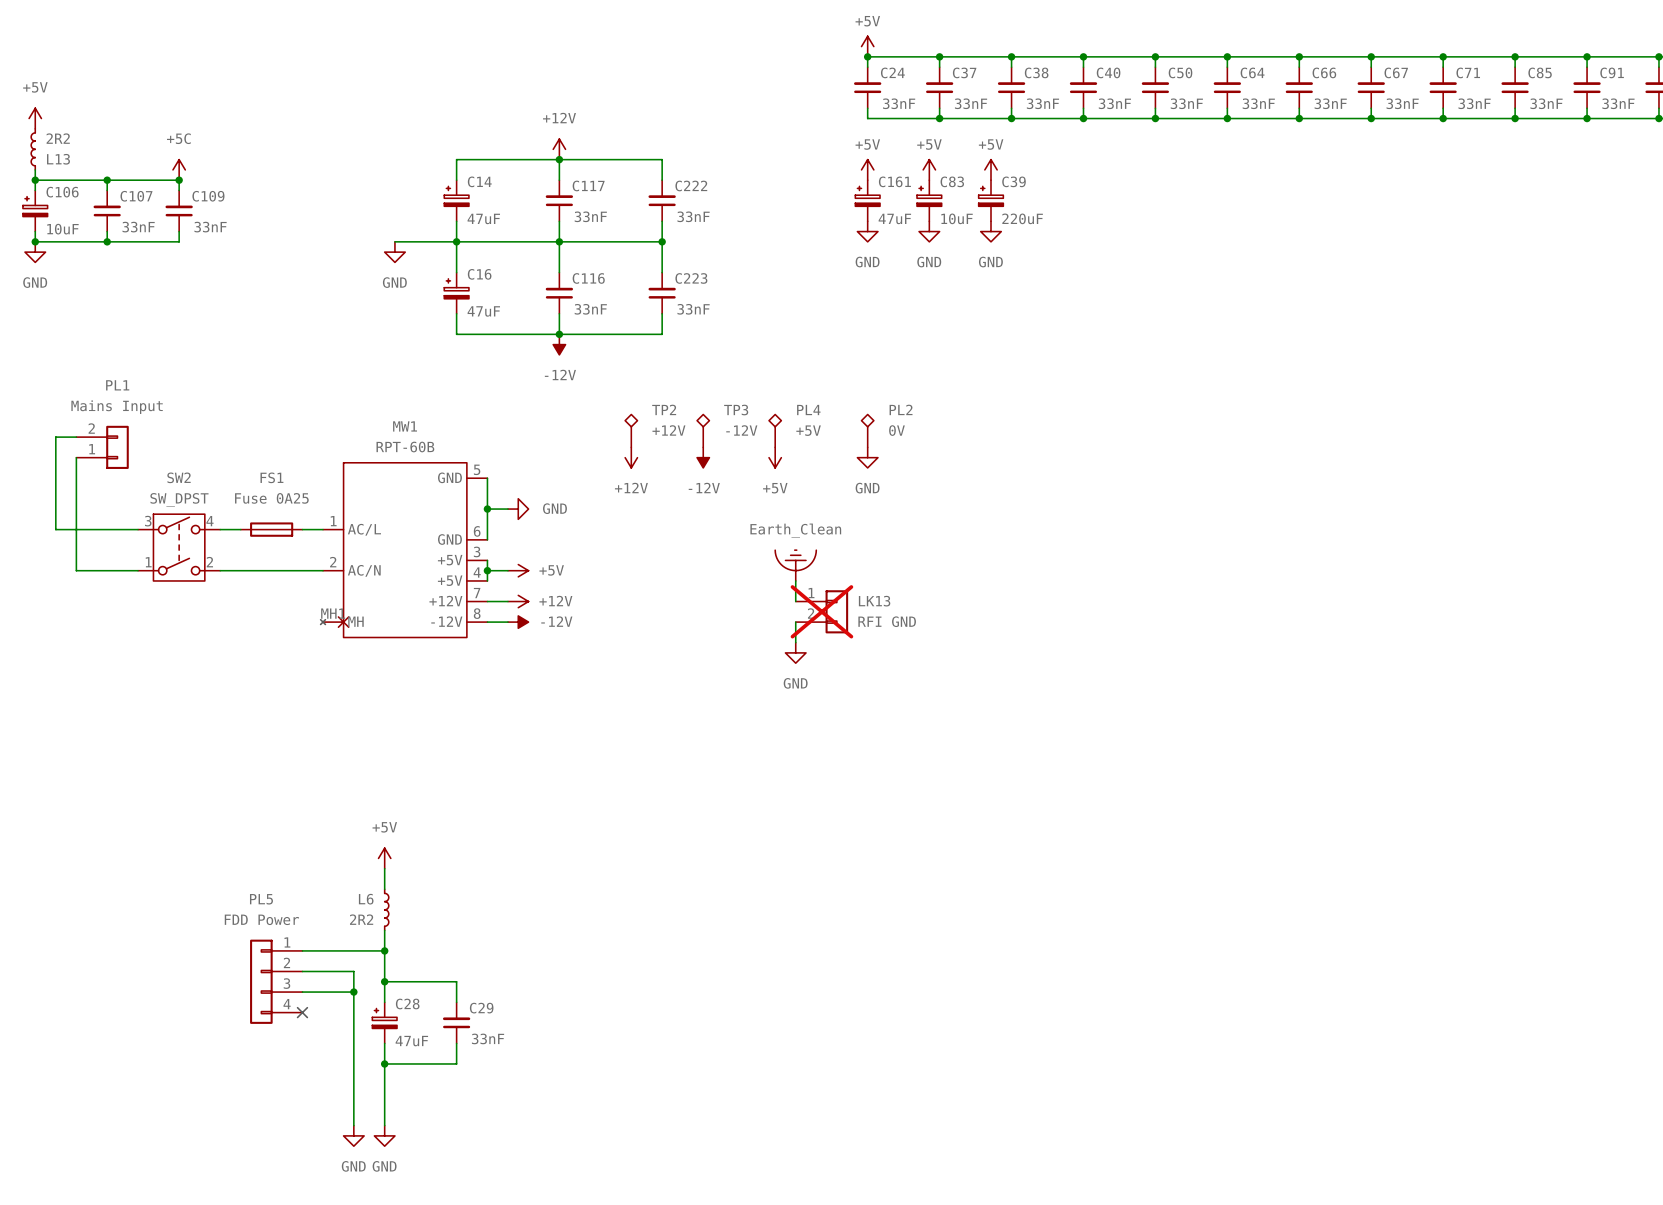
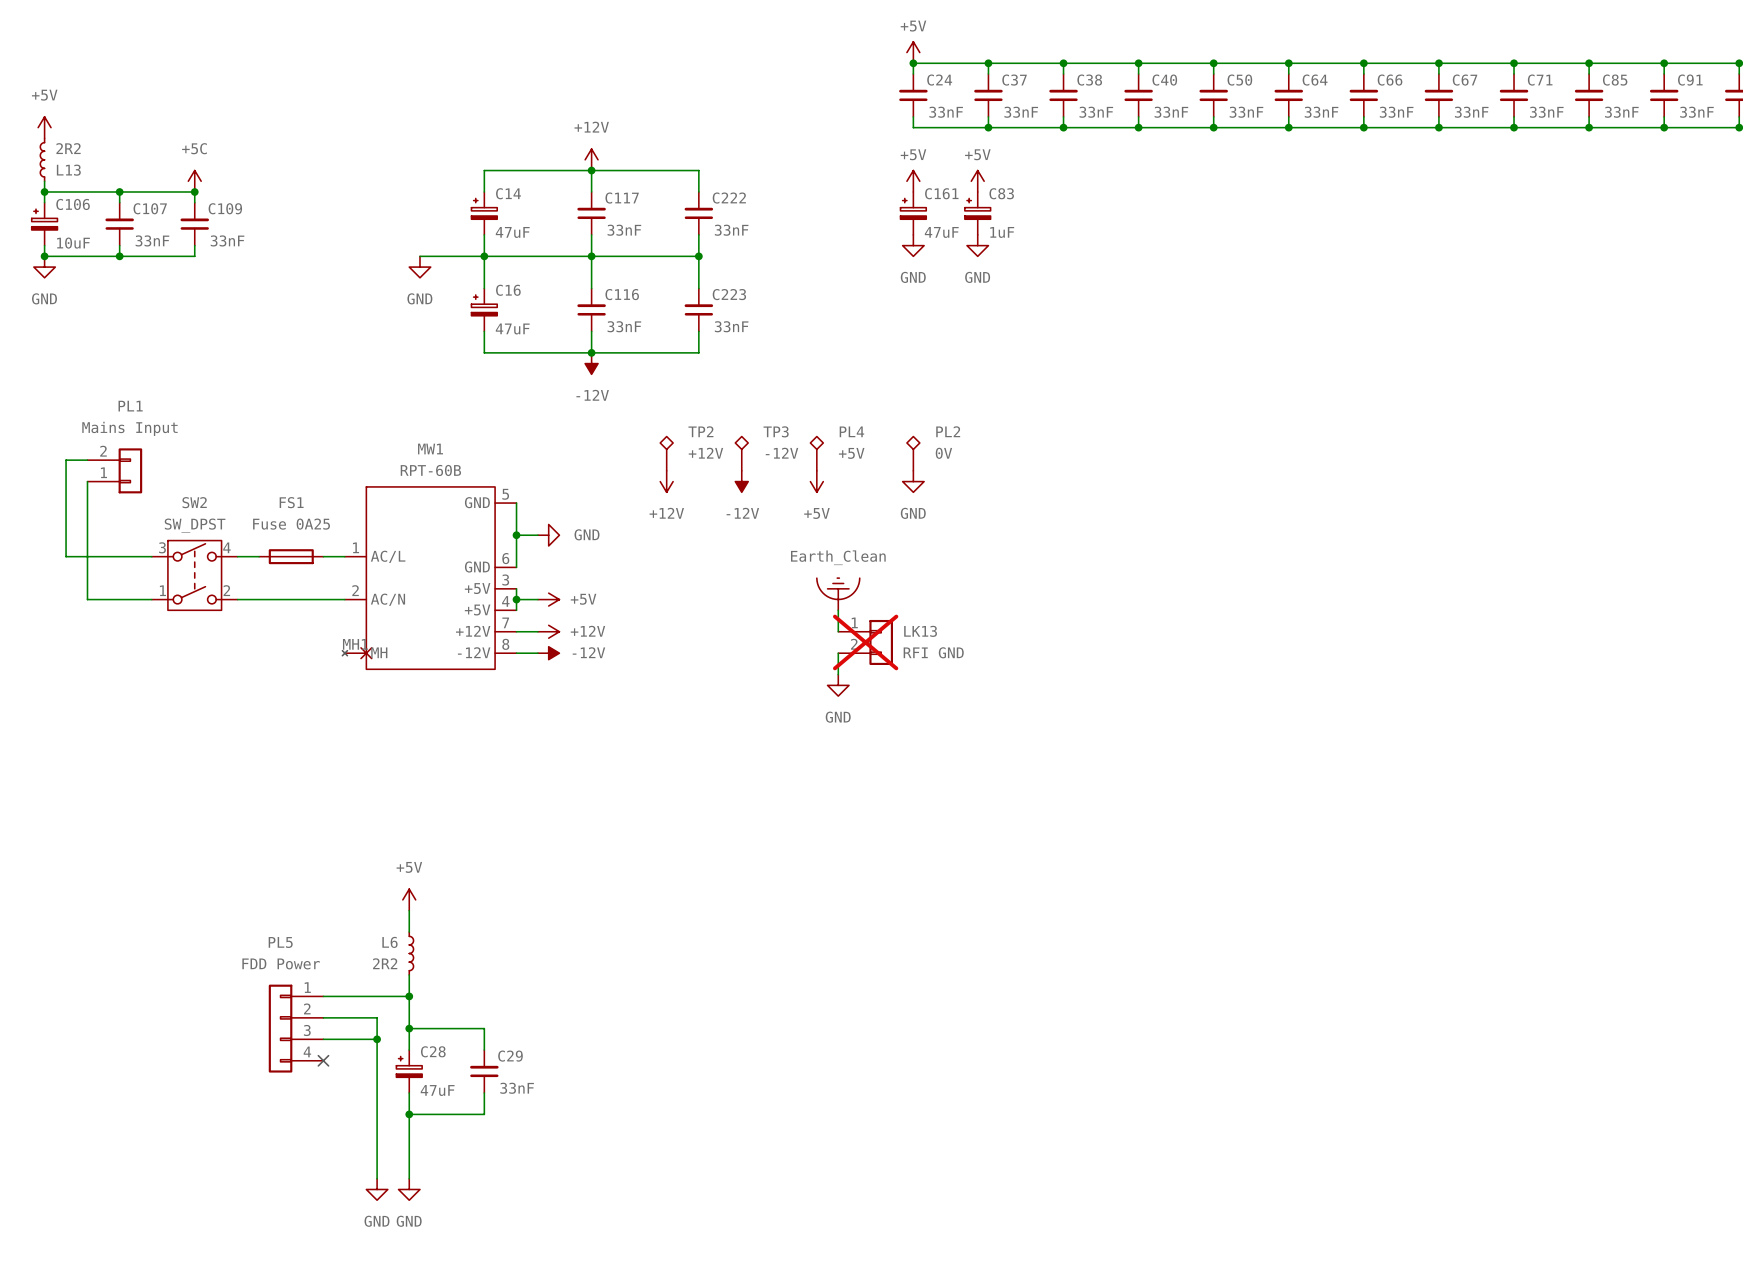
power symbol: +5V (991, 169) -> none
C39: 220uF (991, 200) -> none
C83 value: 10uF (957, 218) -> 1uF (1002, 232)
power symbol: GND (991, 231) -> none

